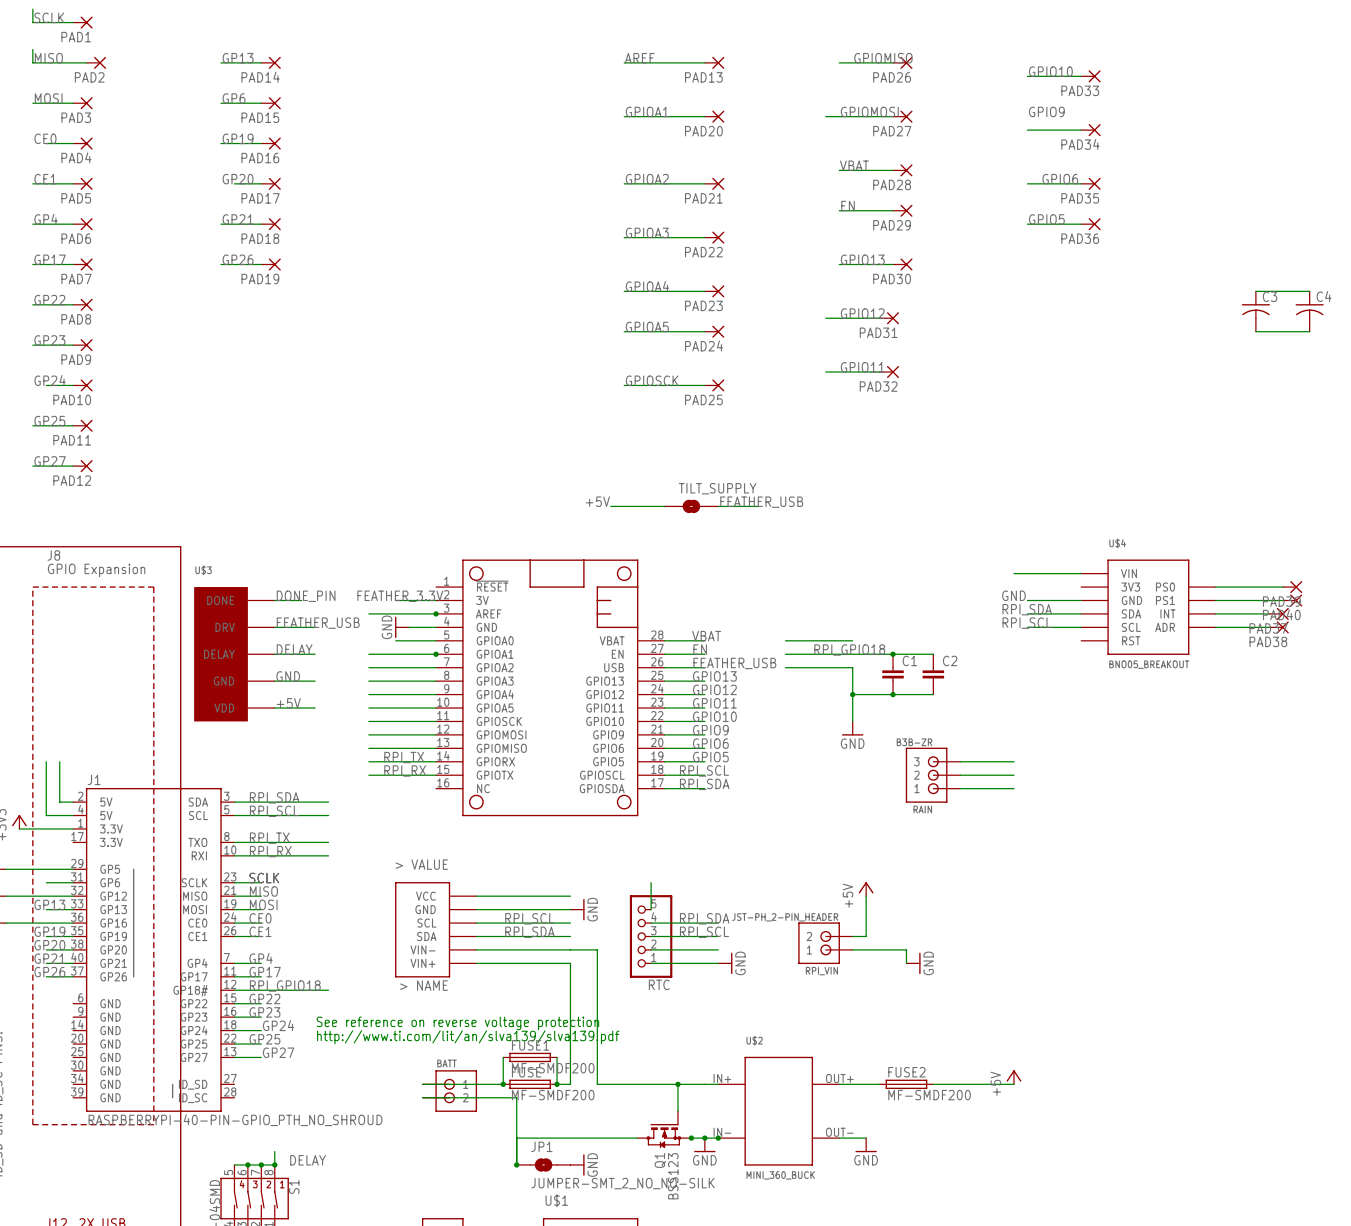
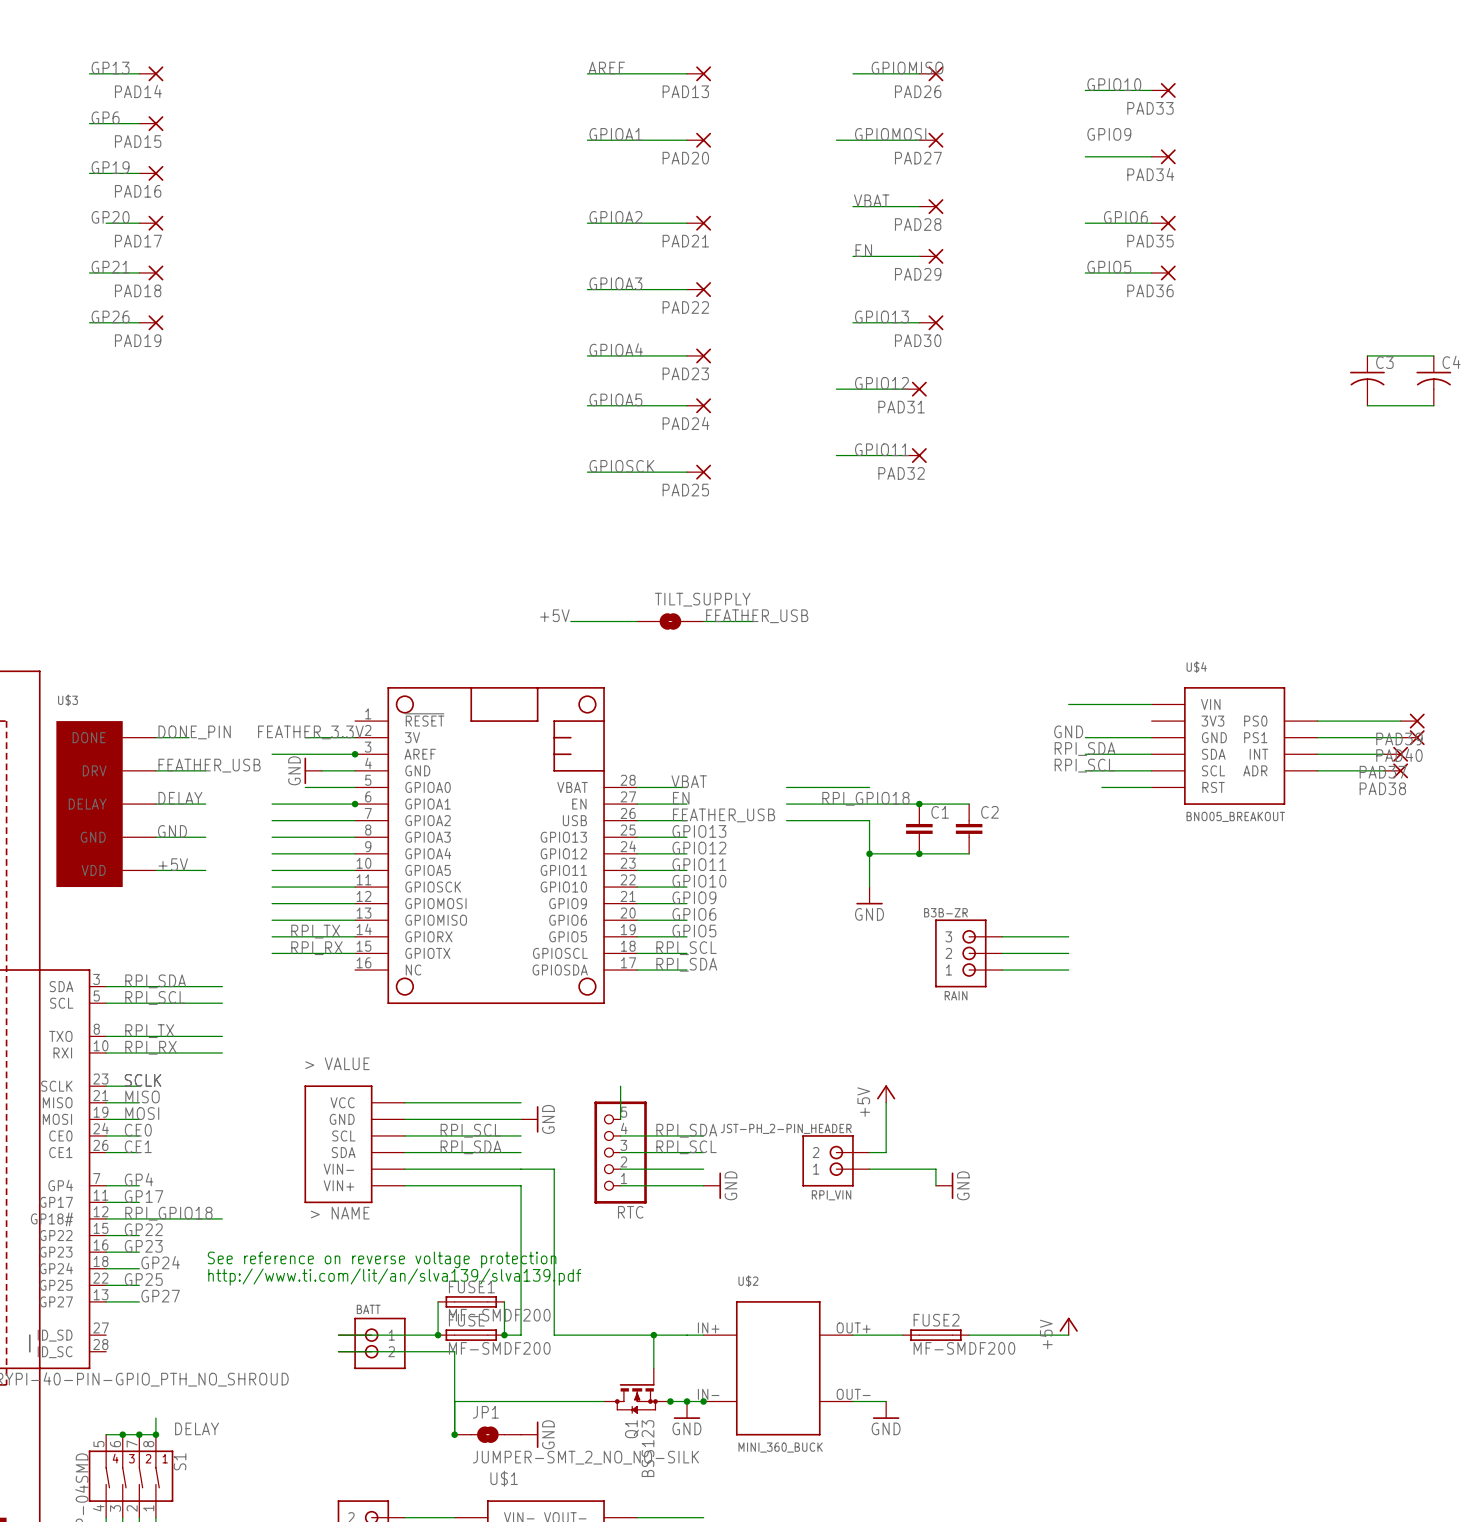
wire: none -> (1101, 787) (1151, 787)

